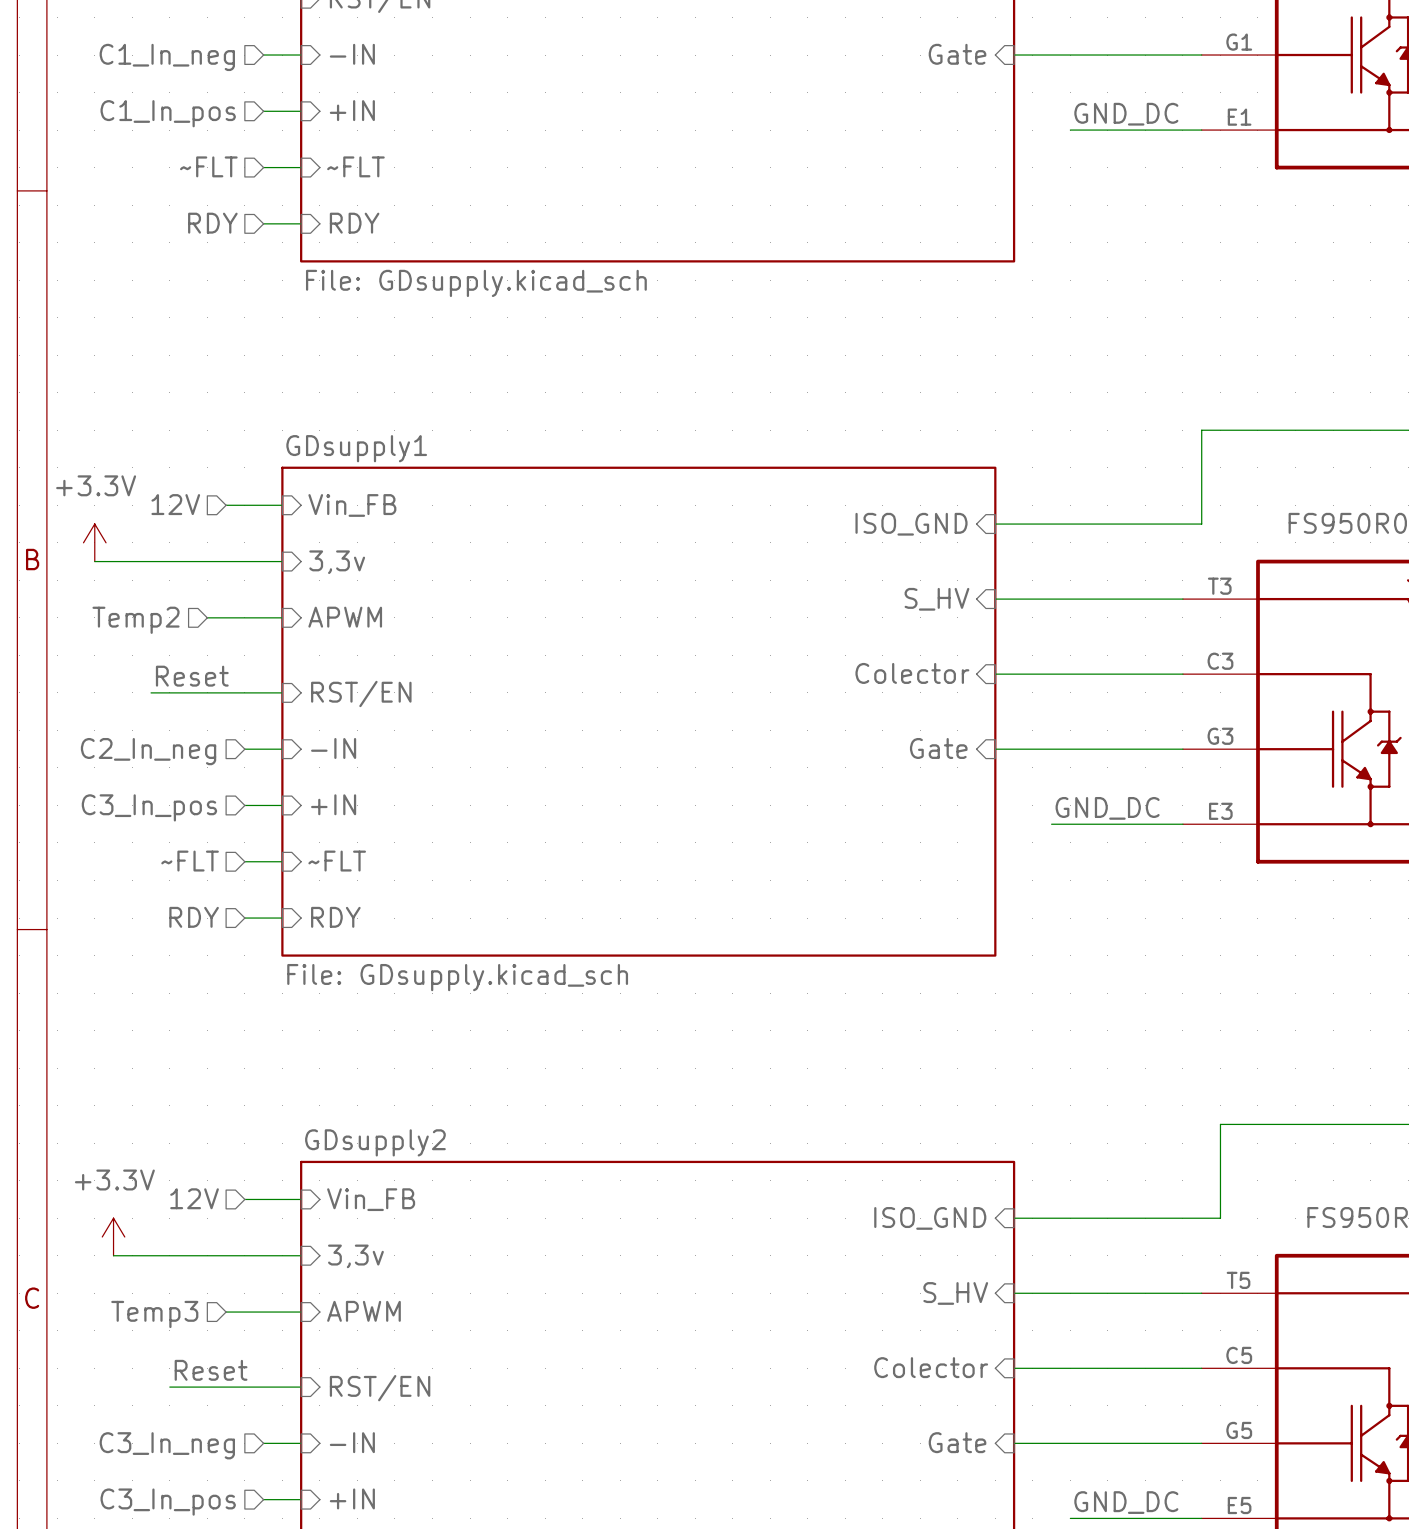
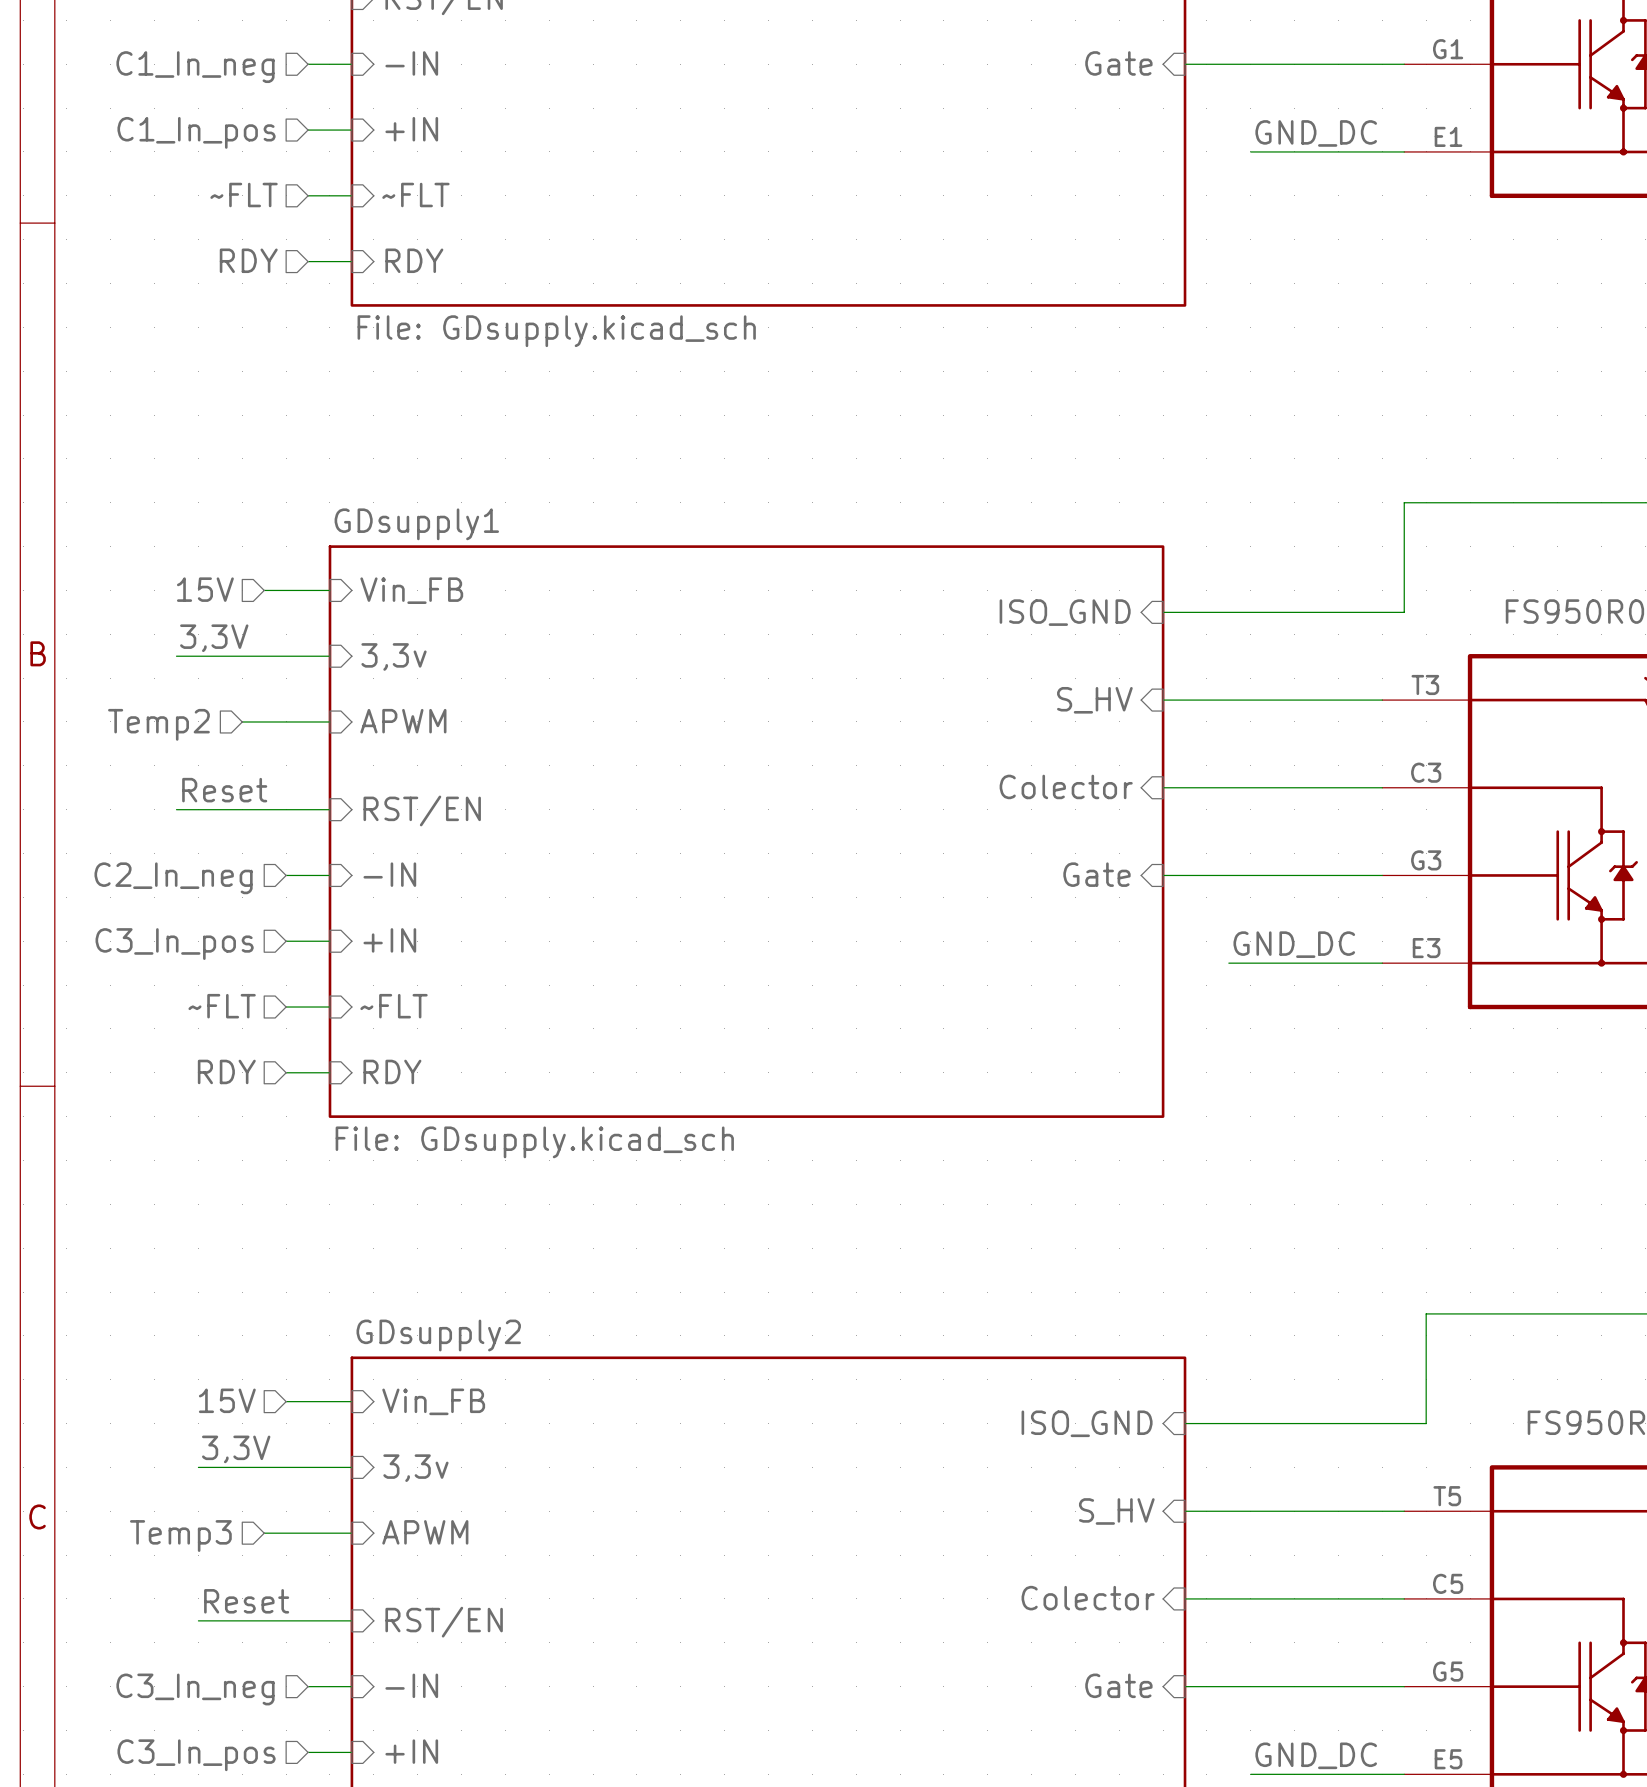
hierarchical label: 12V (175, 504) -> 15V (205, 589)
power symbol: +3.3V (94, 542) -> none
label: none -> 3,3V (214, 638)
wire: (94, 561) (151, 561) -> none
hierarchical label: 12V (194, 1198) -> 15V (227, 1400)
power symbol: +3.3V (113, 1236) -> none
label: none -> 3,3V (236, 1449)
wire: (113, 1255) (169, 1255) -> none

